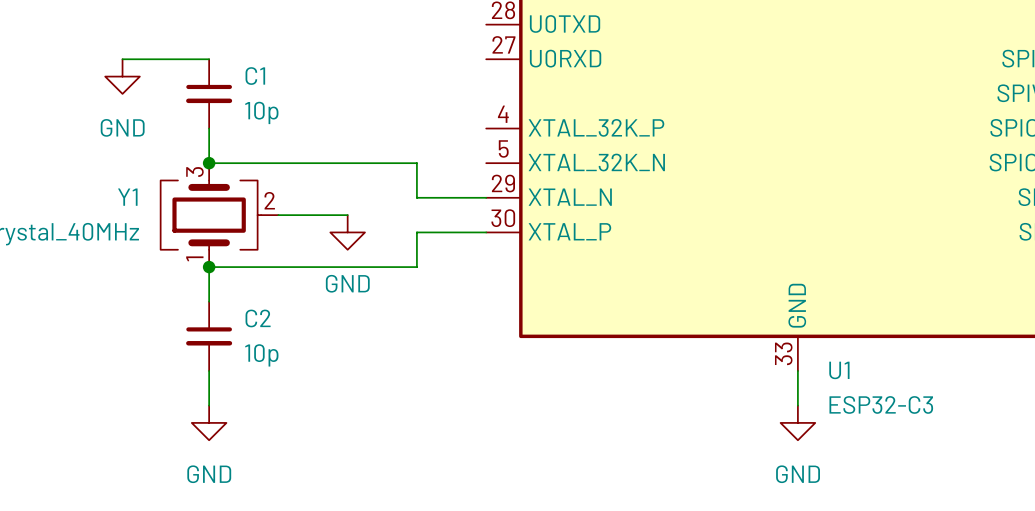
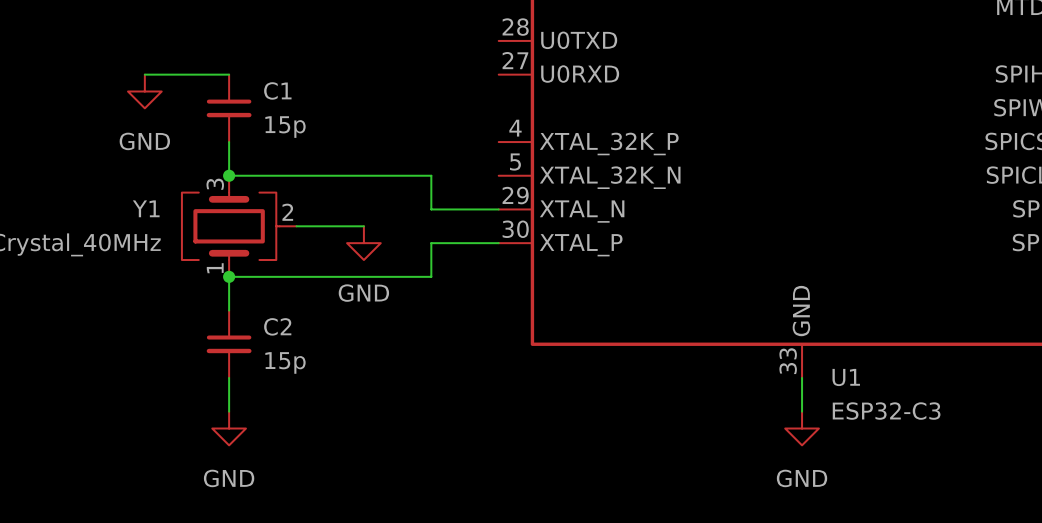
C1 value: 10p (261, 112) -> 15p (285, 127)
C2 value: 10p (261, 355) -> 15p (285, 362)

